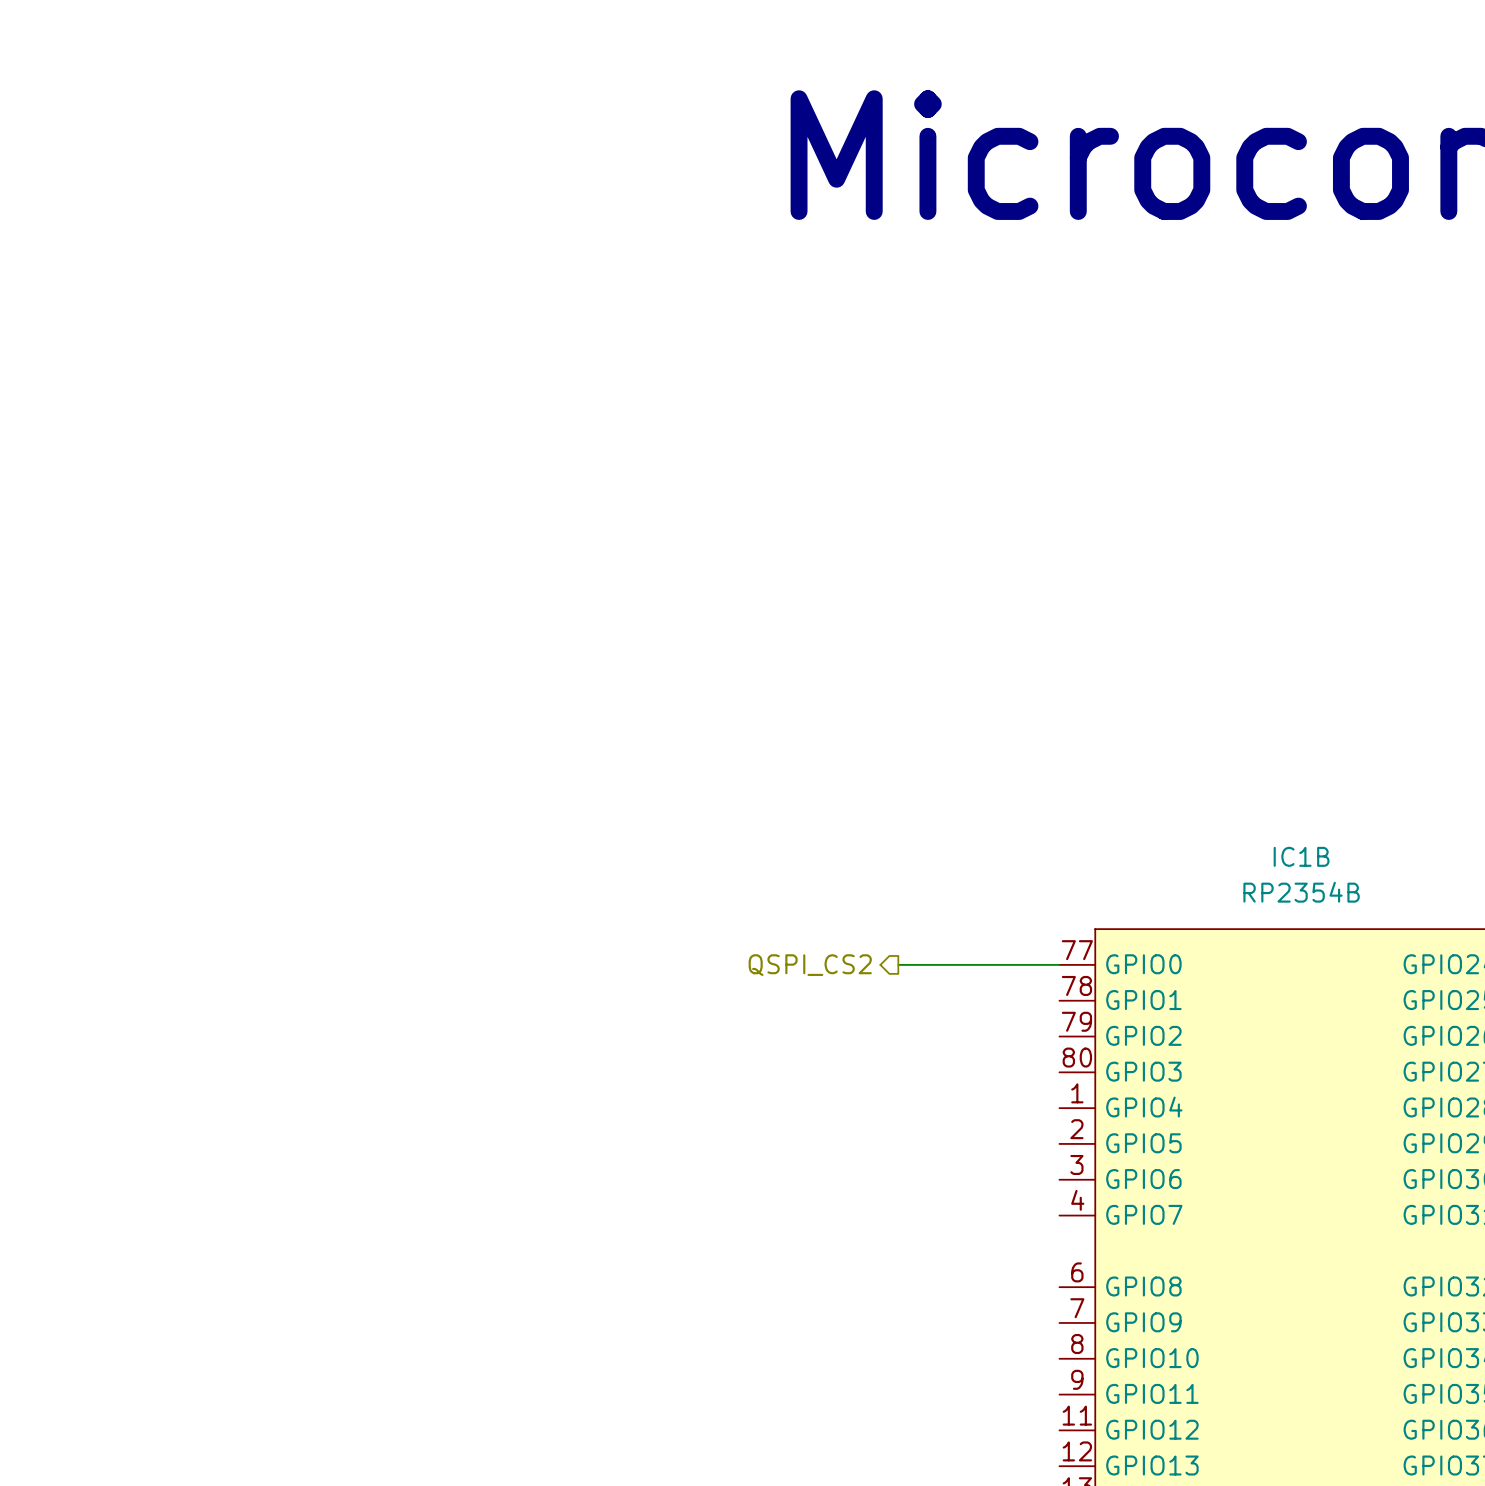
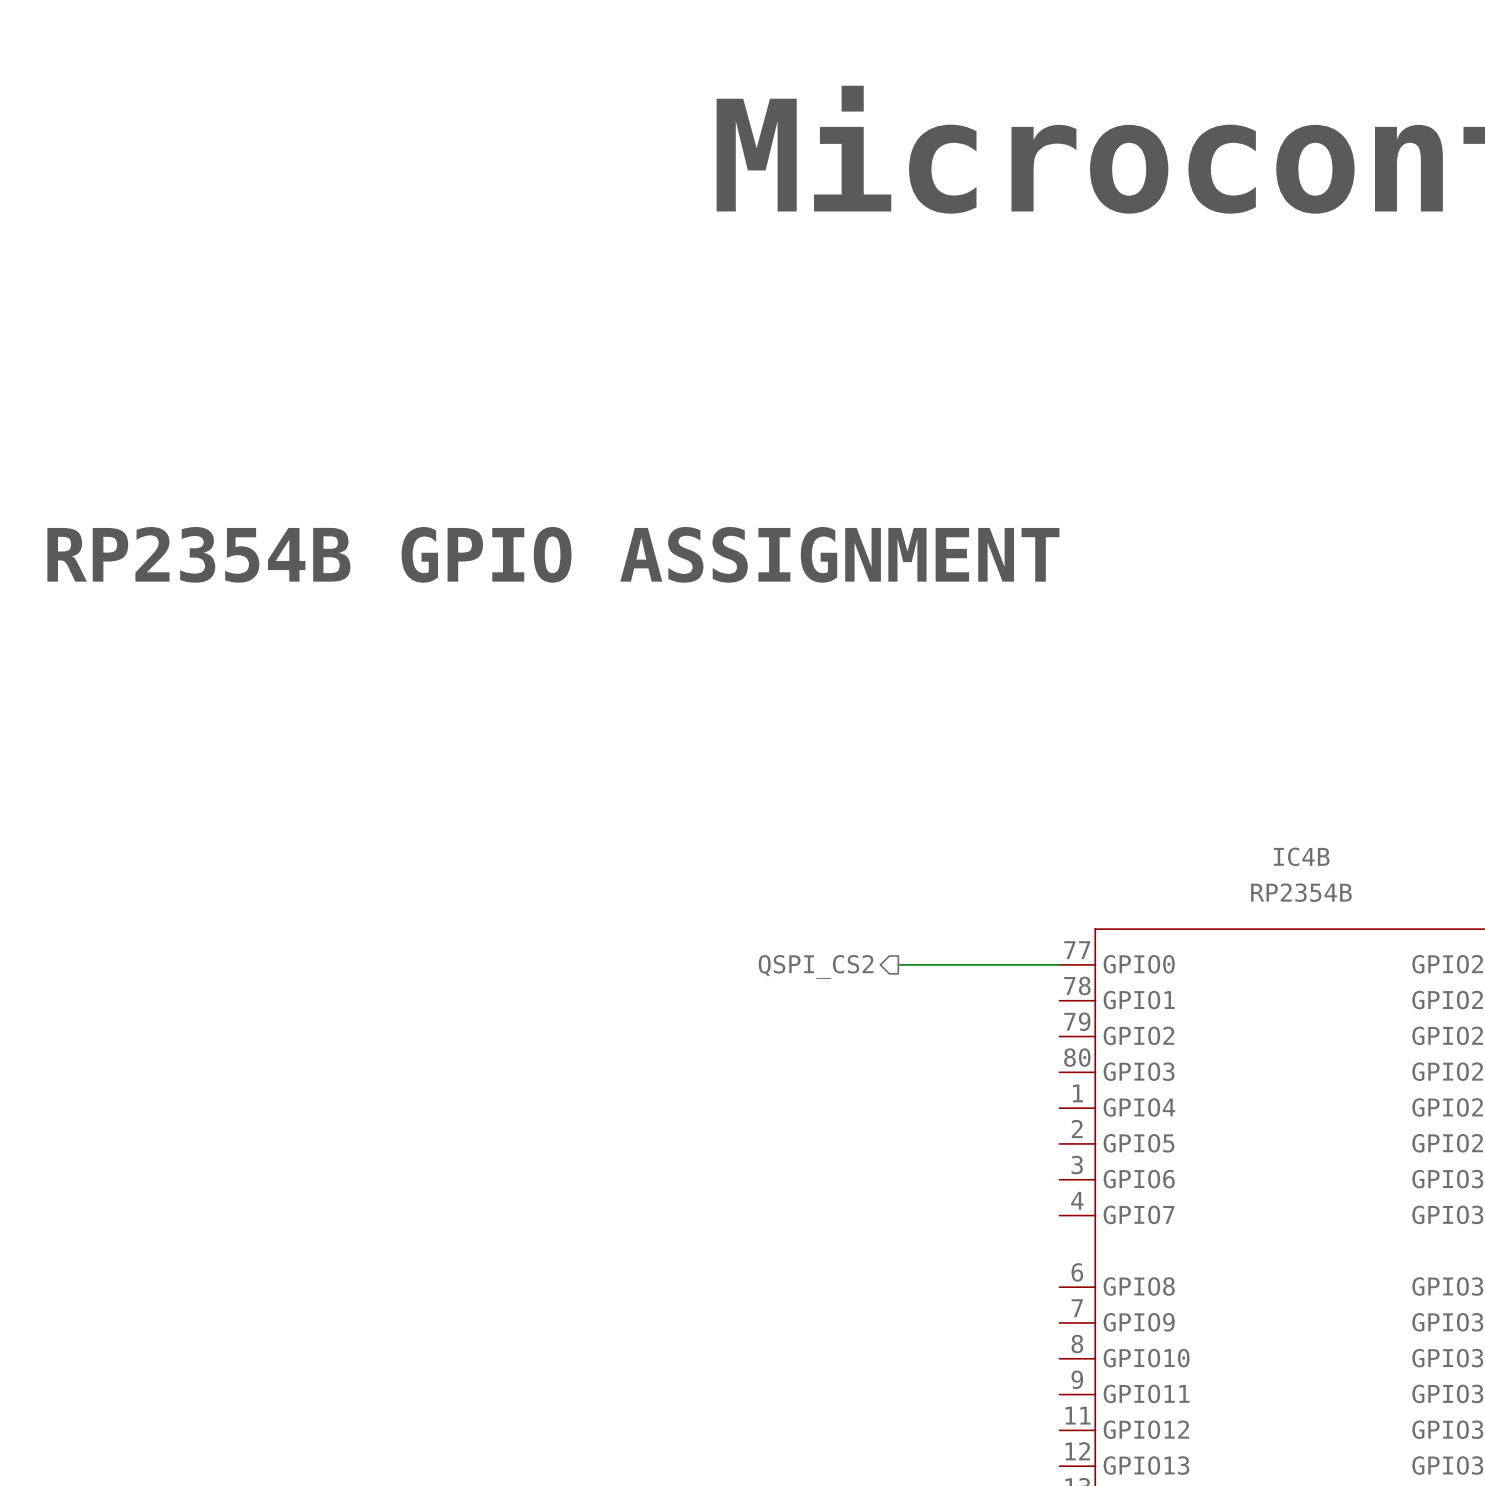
text: none -> RP2354B GPIO ASSIGNMENT (553, 554)
IC1B name: IC1B (1301, 856) -> IC4B (1301, 856)

